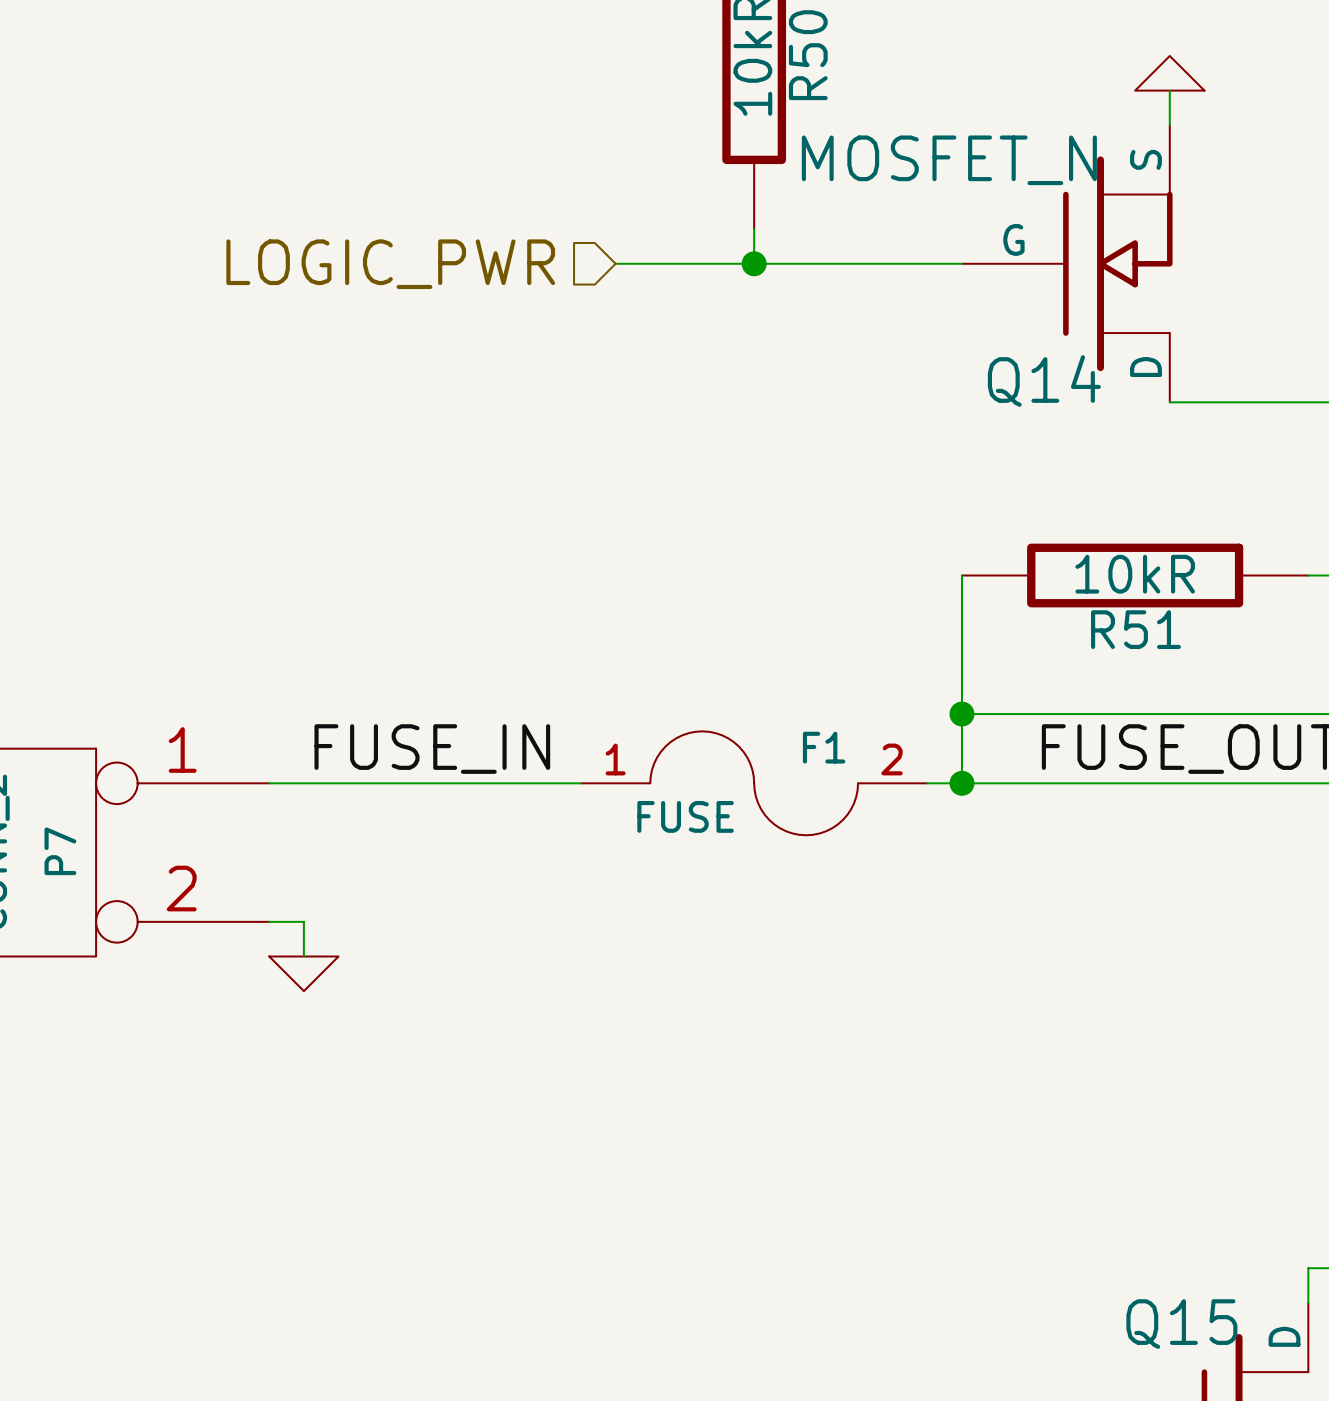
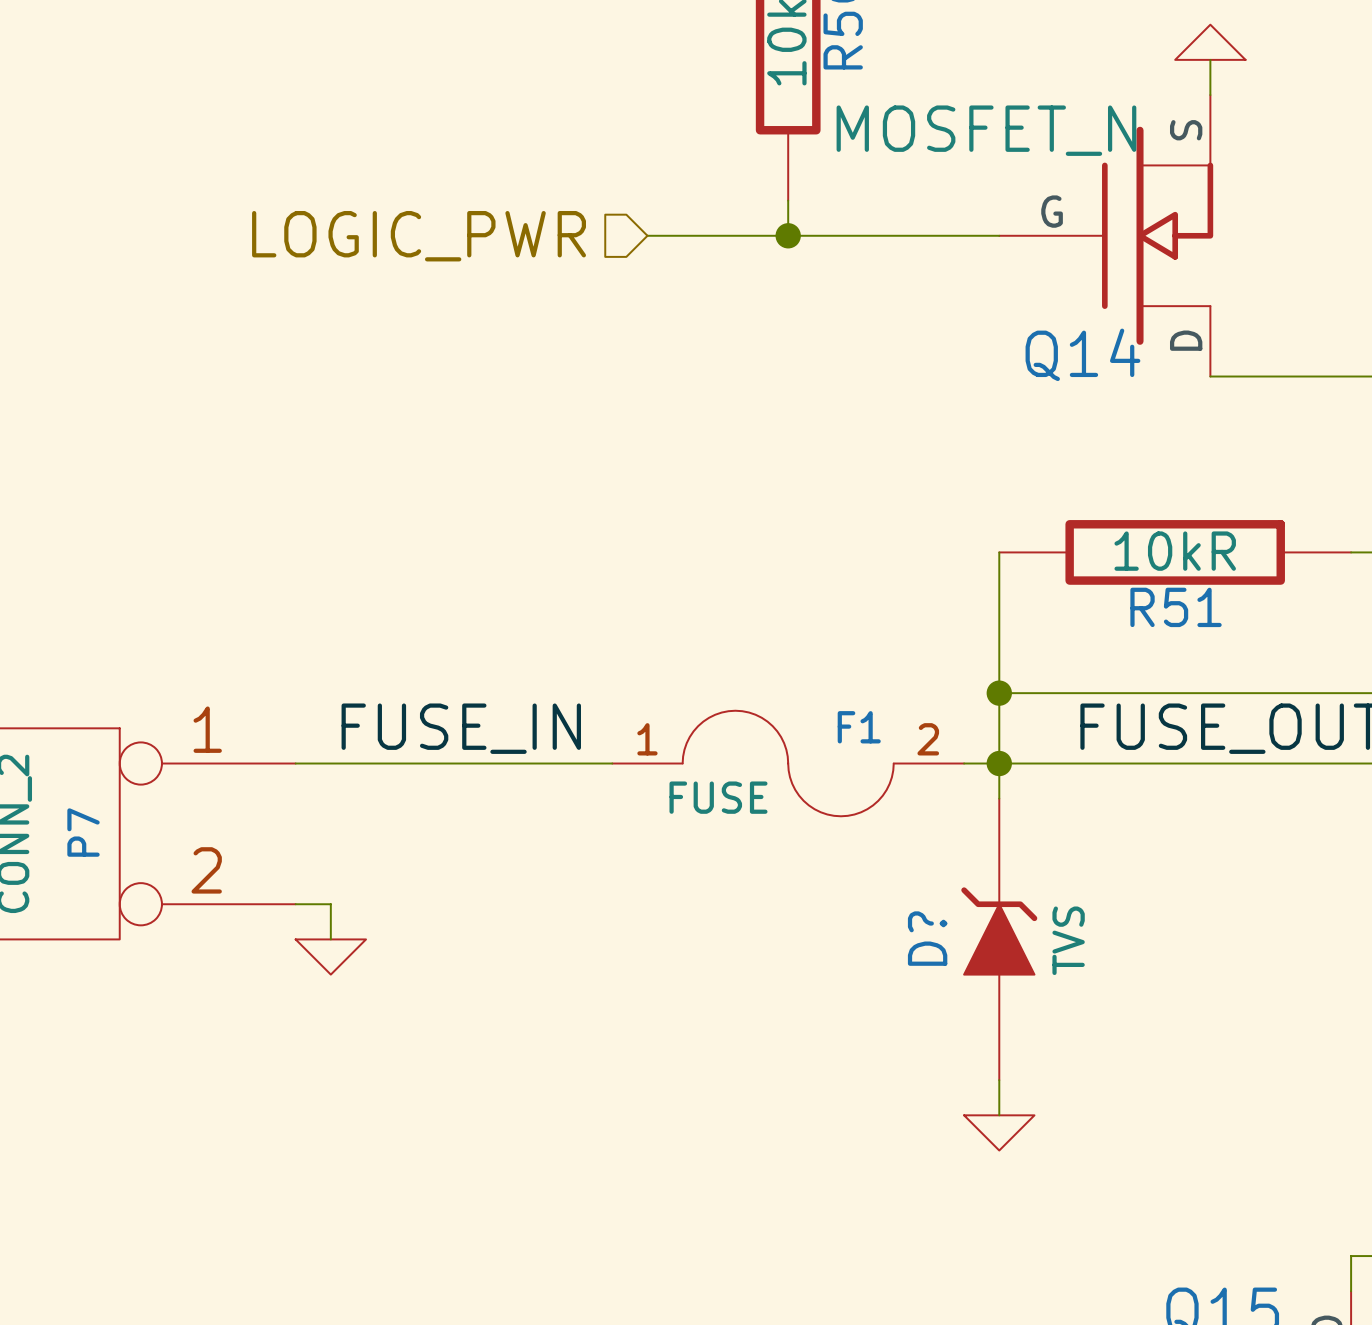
wire: none -> (999, 763) (999, 798)
D?: none -> TVS (999, 939)
wire: none -> (999, 1080) (999, 1115)
power symbol: none -> (999, 1132)

